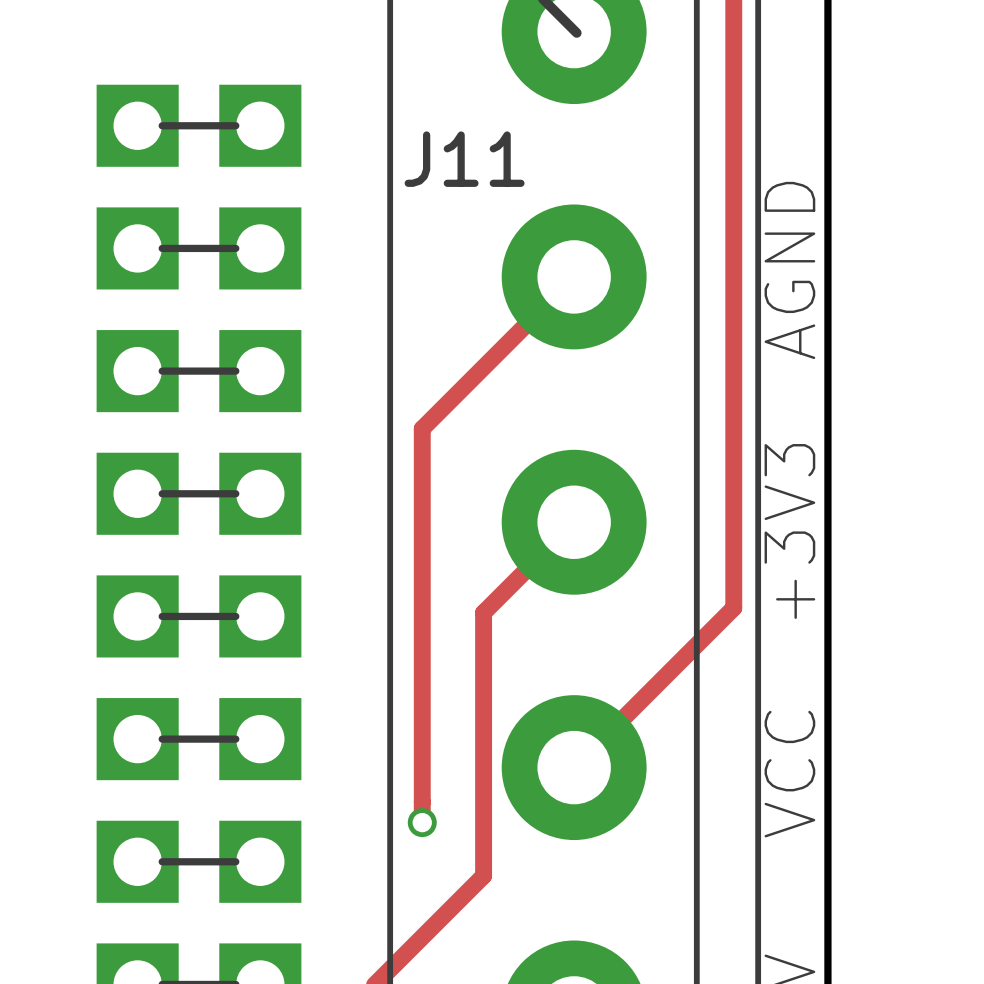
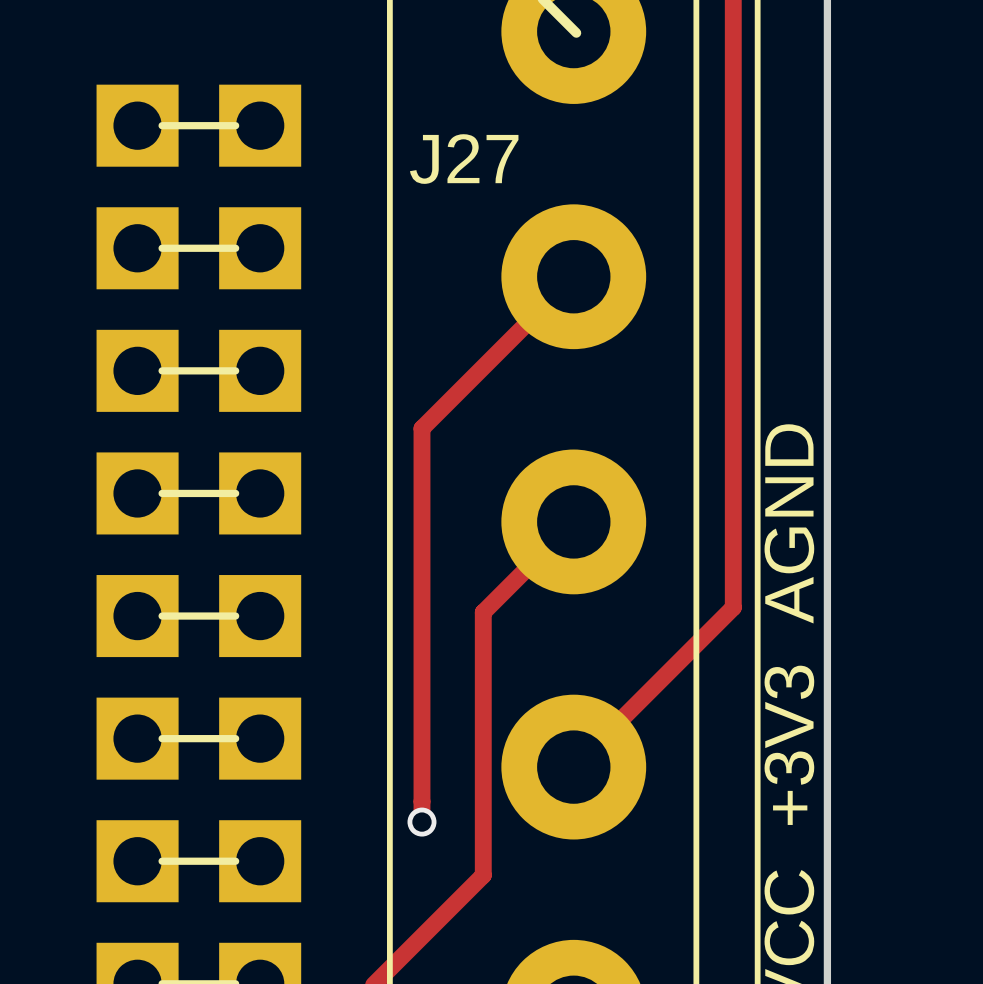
J11 name: J11 (464, 159) -> J27 (464, 159)

